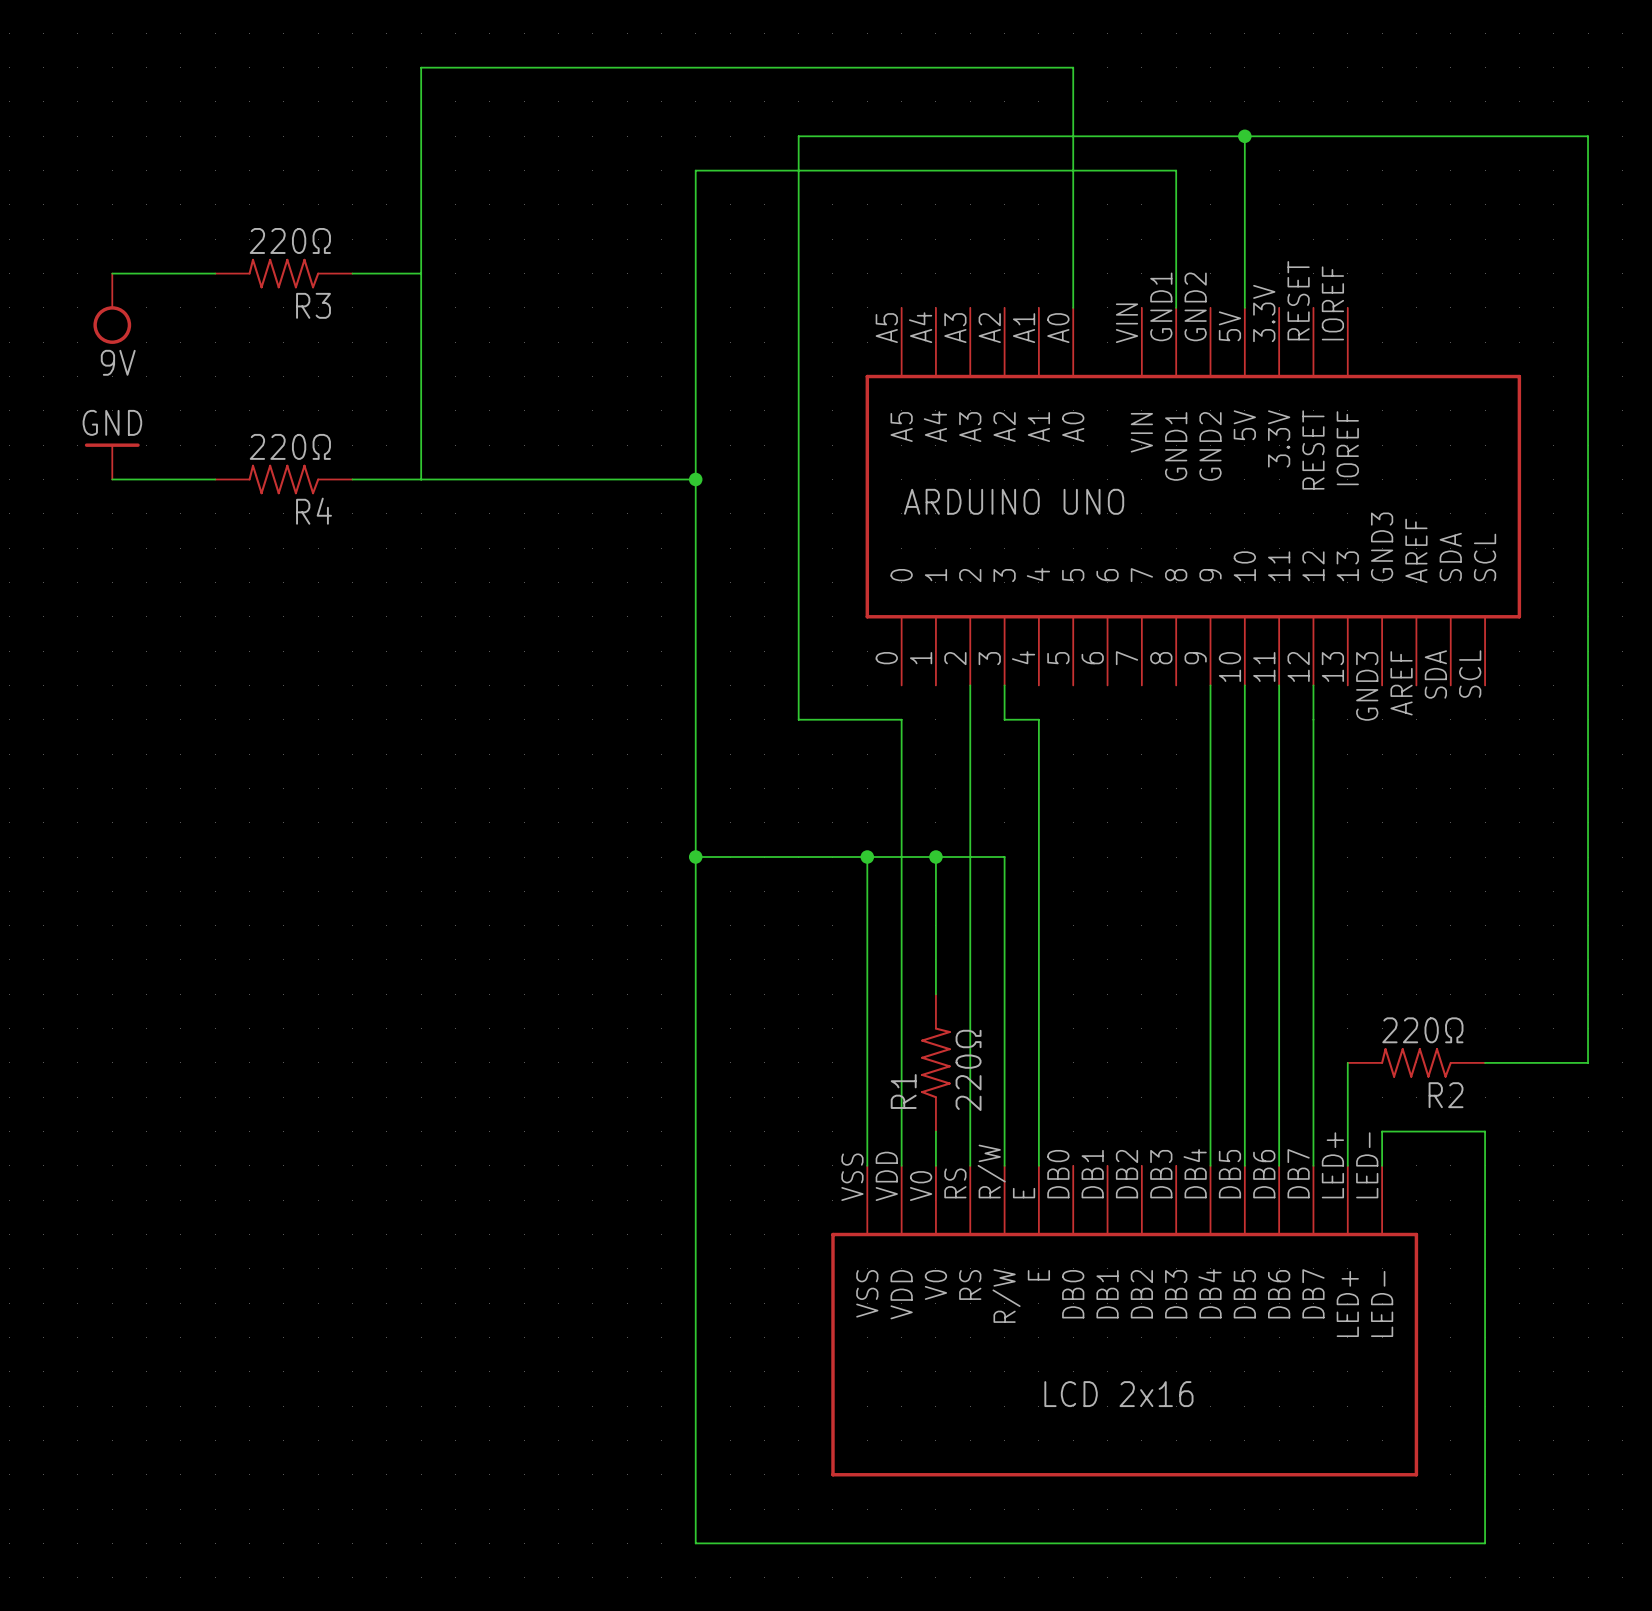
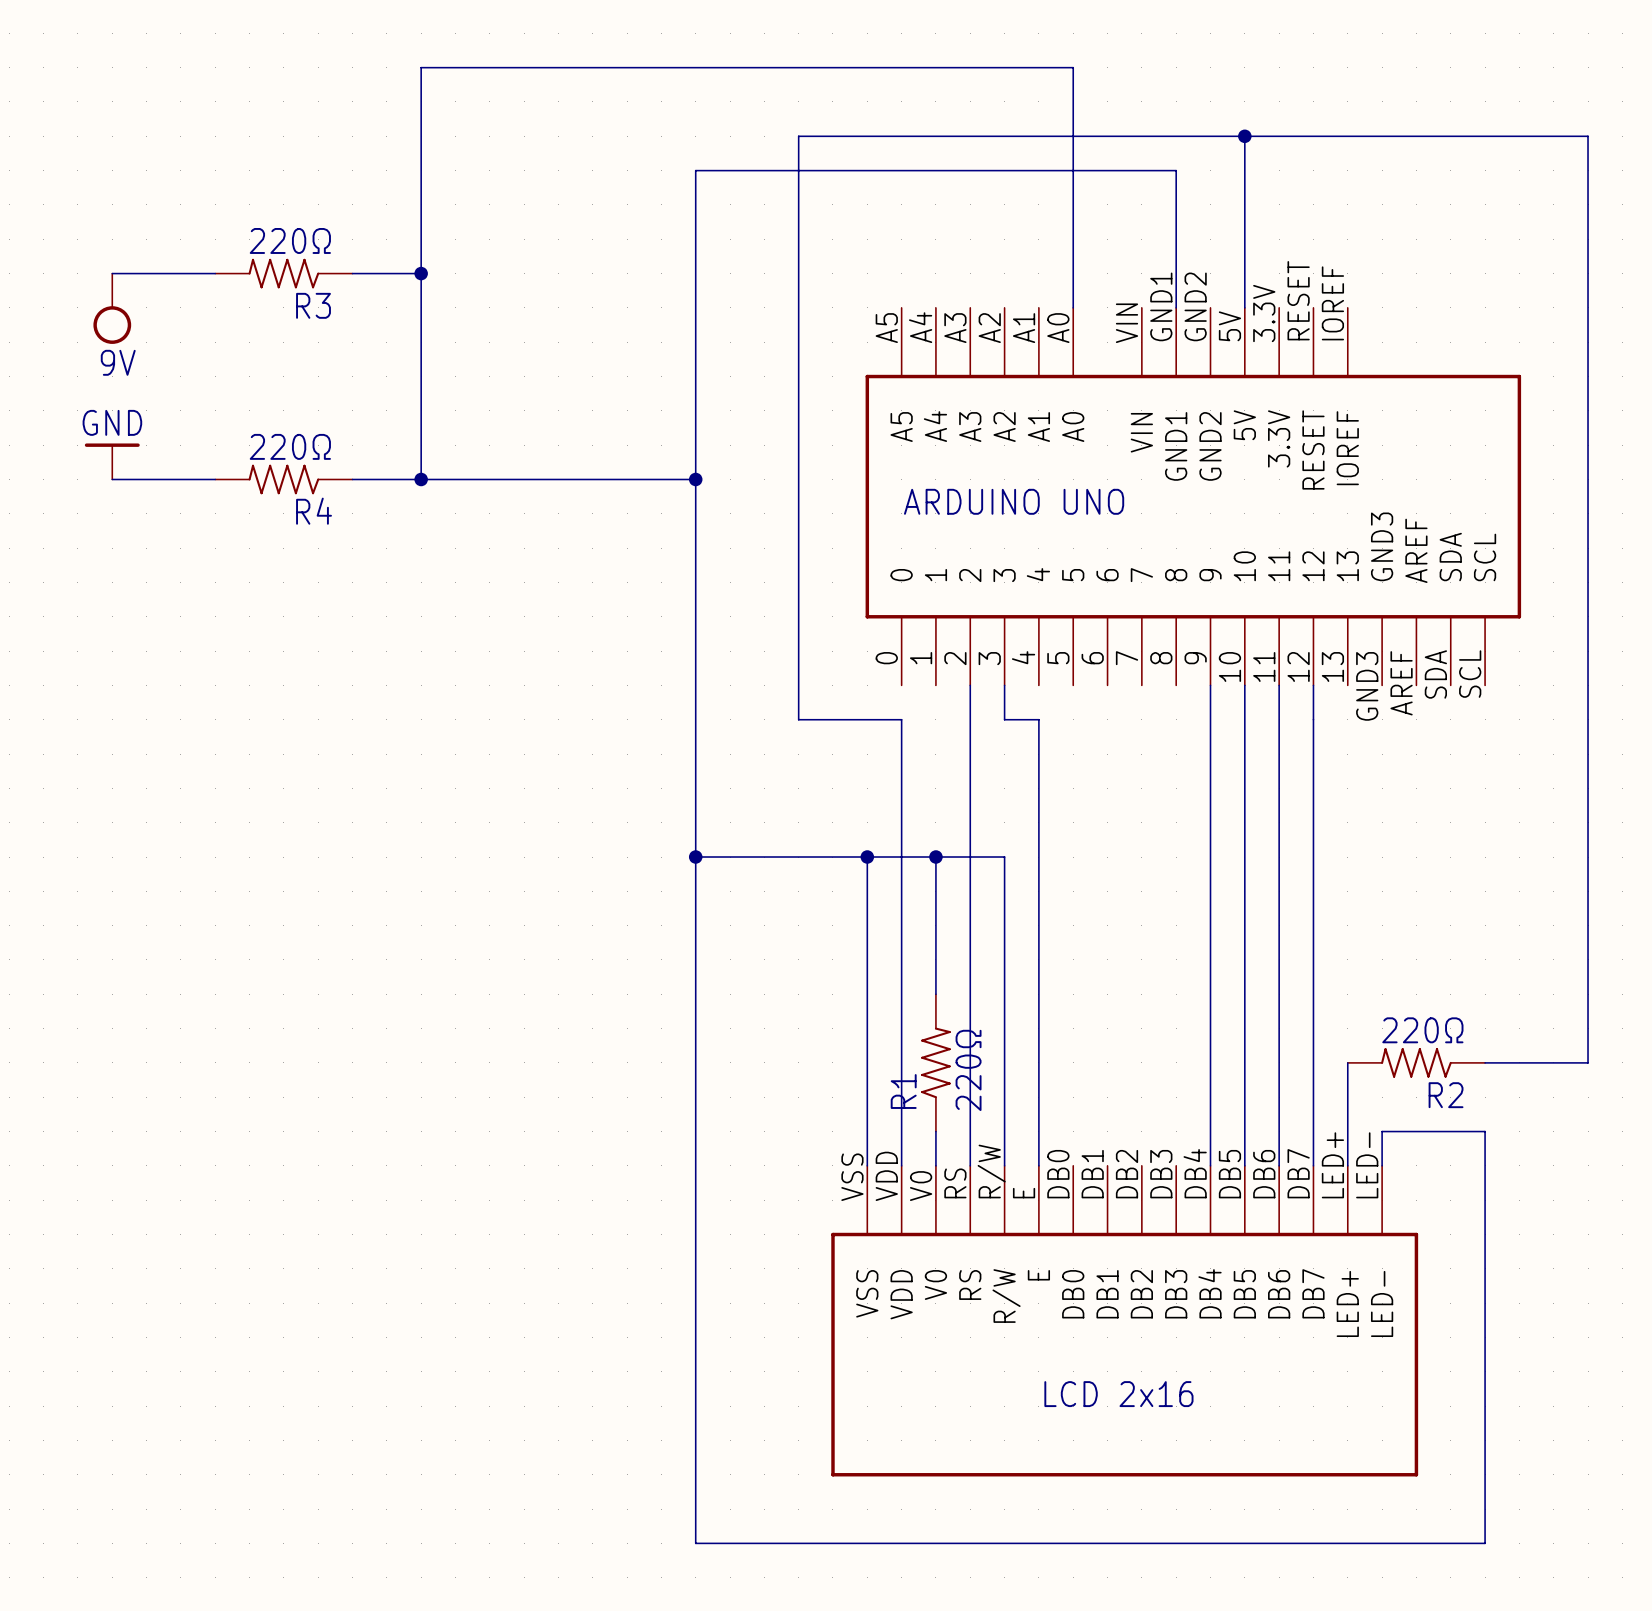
junction: none -> (421, 273)
junction: none -> (421, 479)

